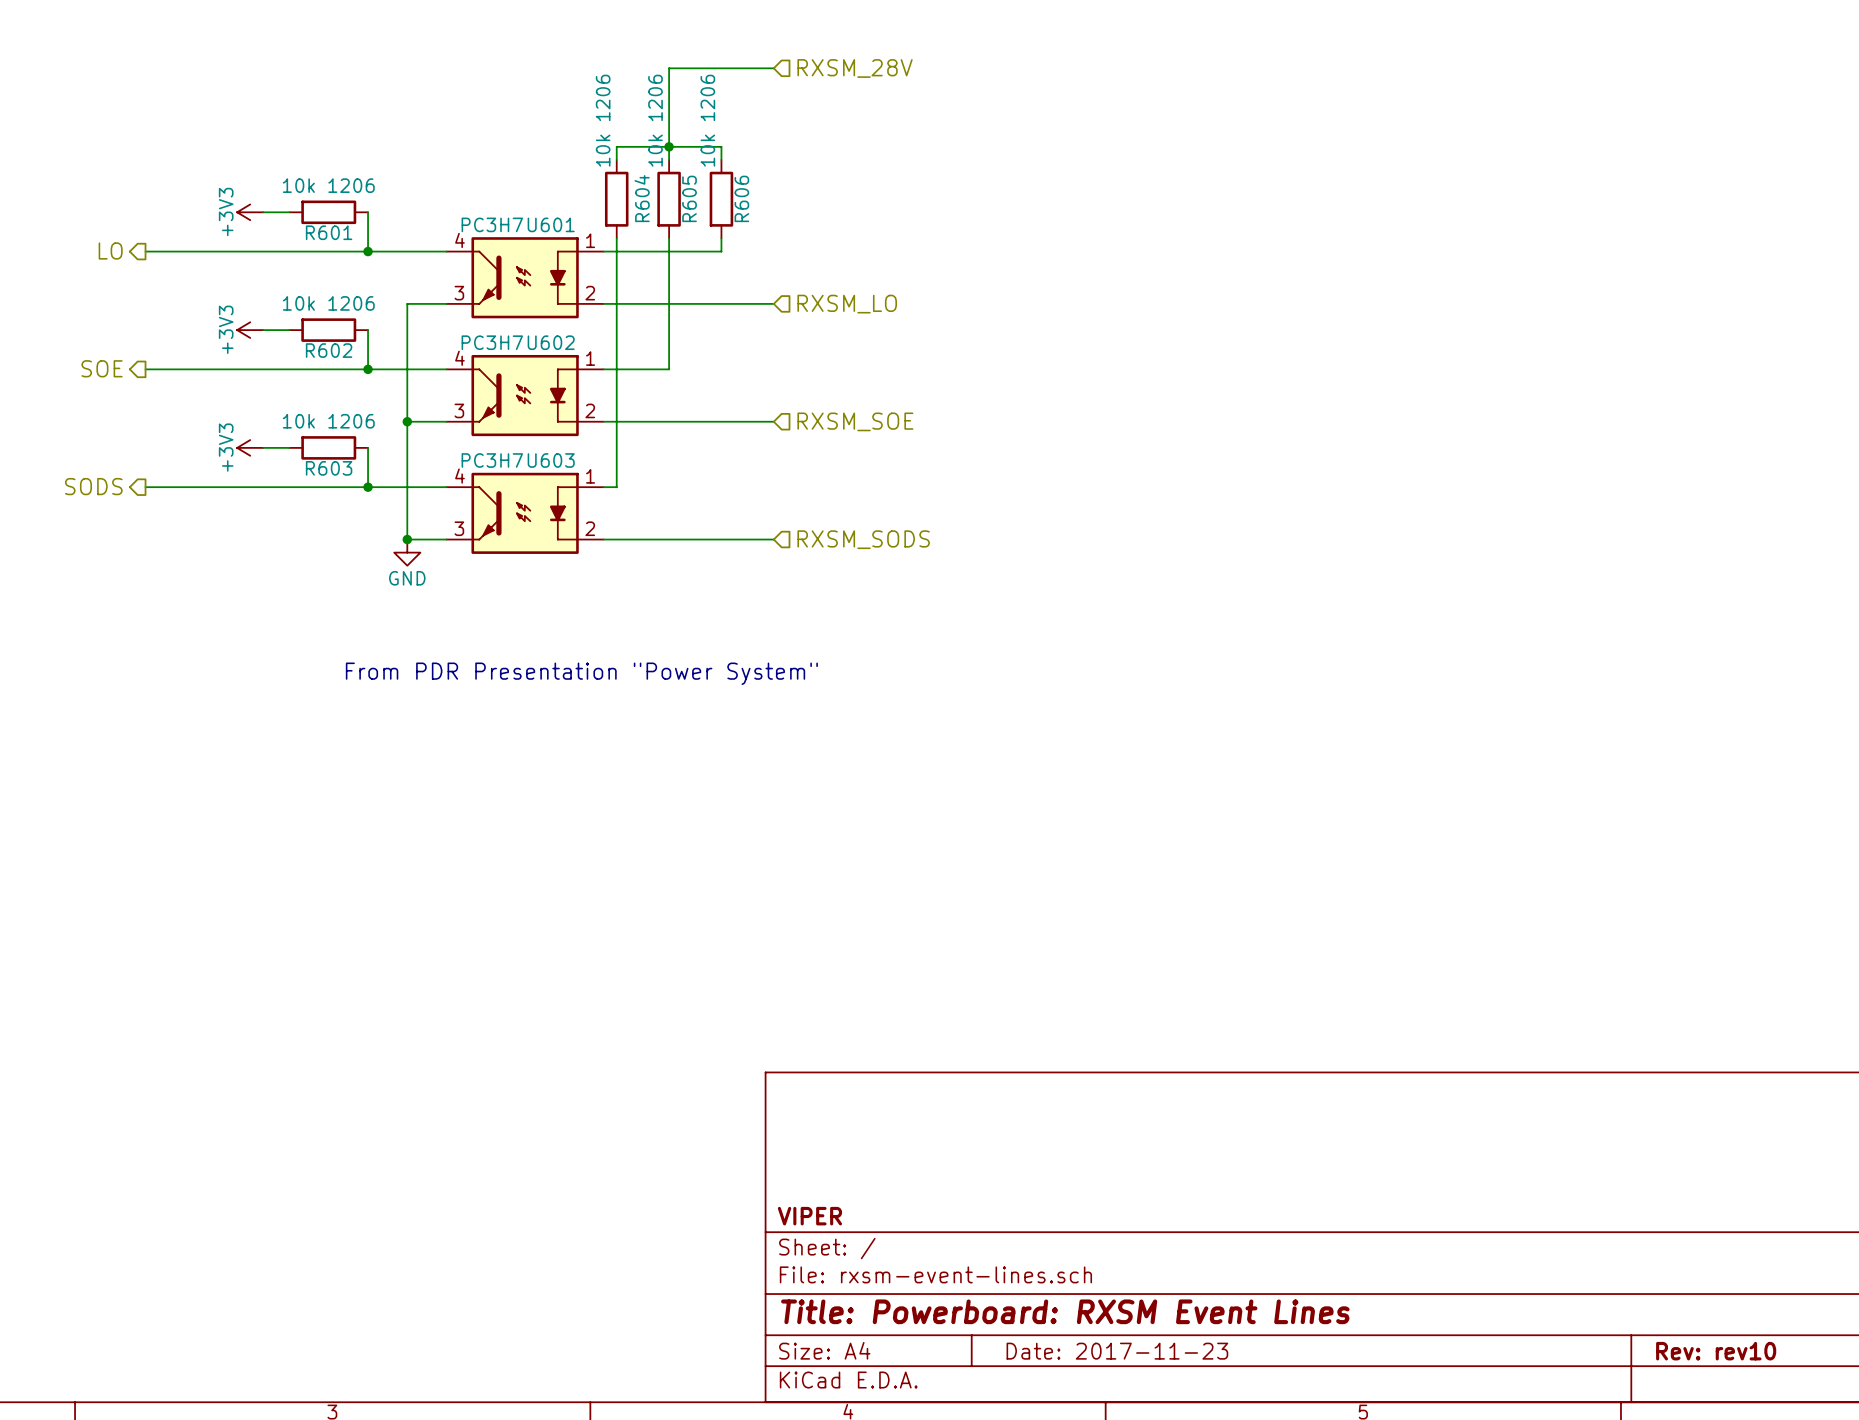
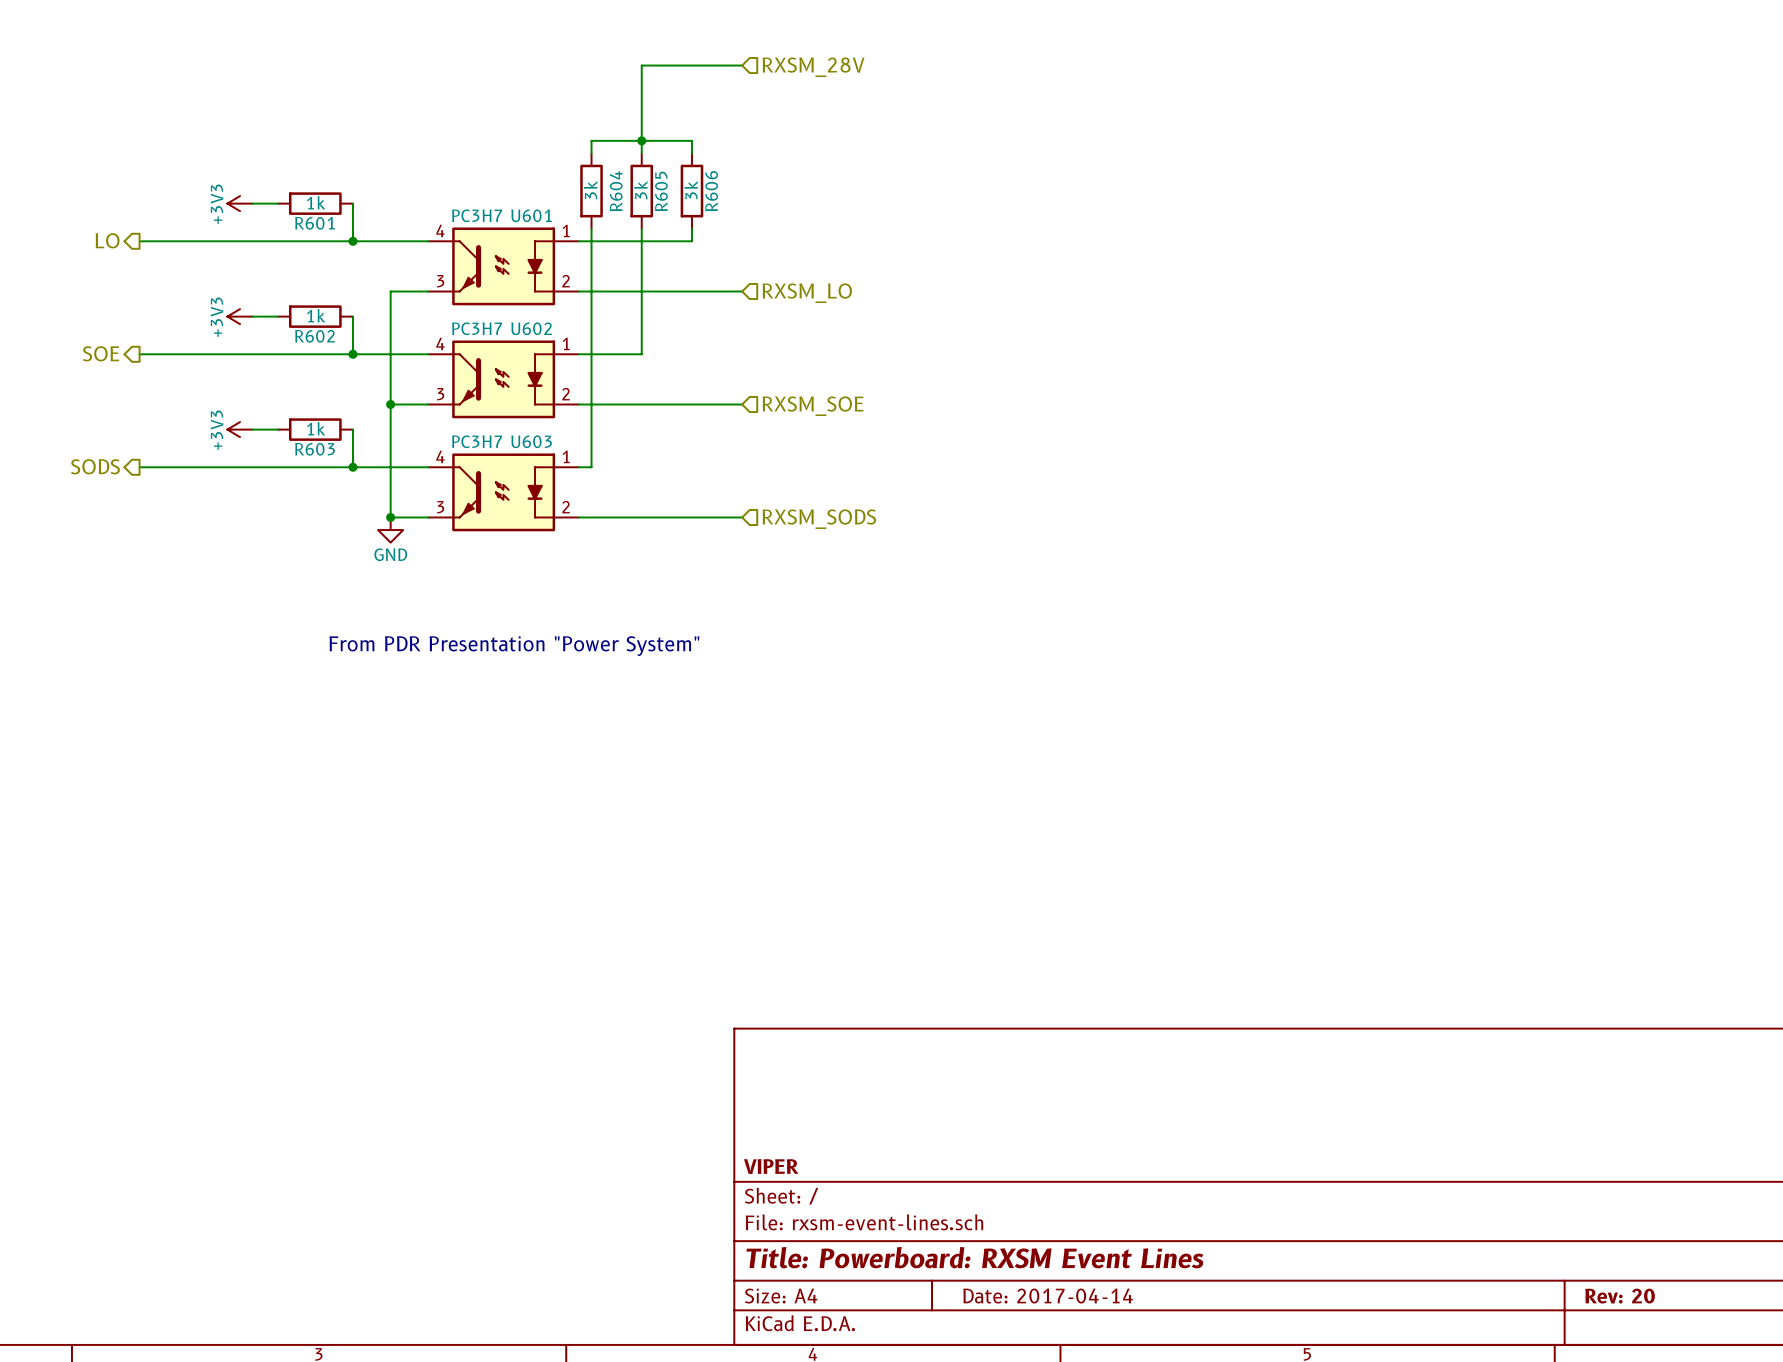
R604 value: 10k 1206 (603, 120) -> 3k (590, 190)
R605 value: 10k 1206 (655, 120) -> 3k (640, 190)
R606 value: 10k 1206 (707, 120) -> 3k (691, 190)
R601 value: 10k 1206 (328, 185) -> 1k (316, 202)
R602 value: 10k 1206 (328, 303) -> 1k (316, 315)
R603 value: 10k 1206 (328, 421) -> 1k (316, 428)
title block: Date: 2017-11-23 (1117, 1351) -> Date: 2017-04-14 (1048, 1296)
title block: Rev: rev10 (1716, 1351) -> Rev: 20 (1620, 1296)

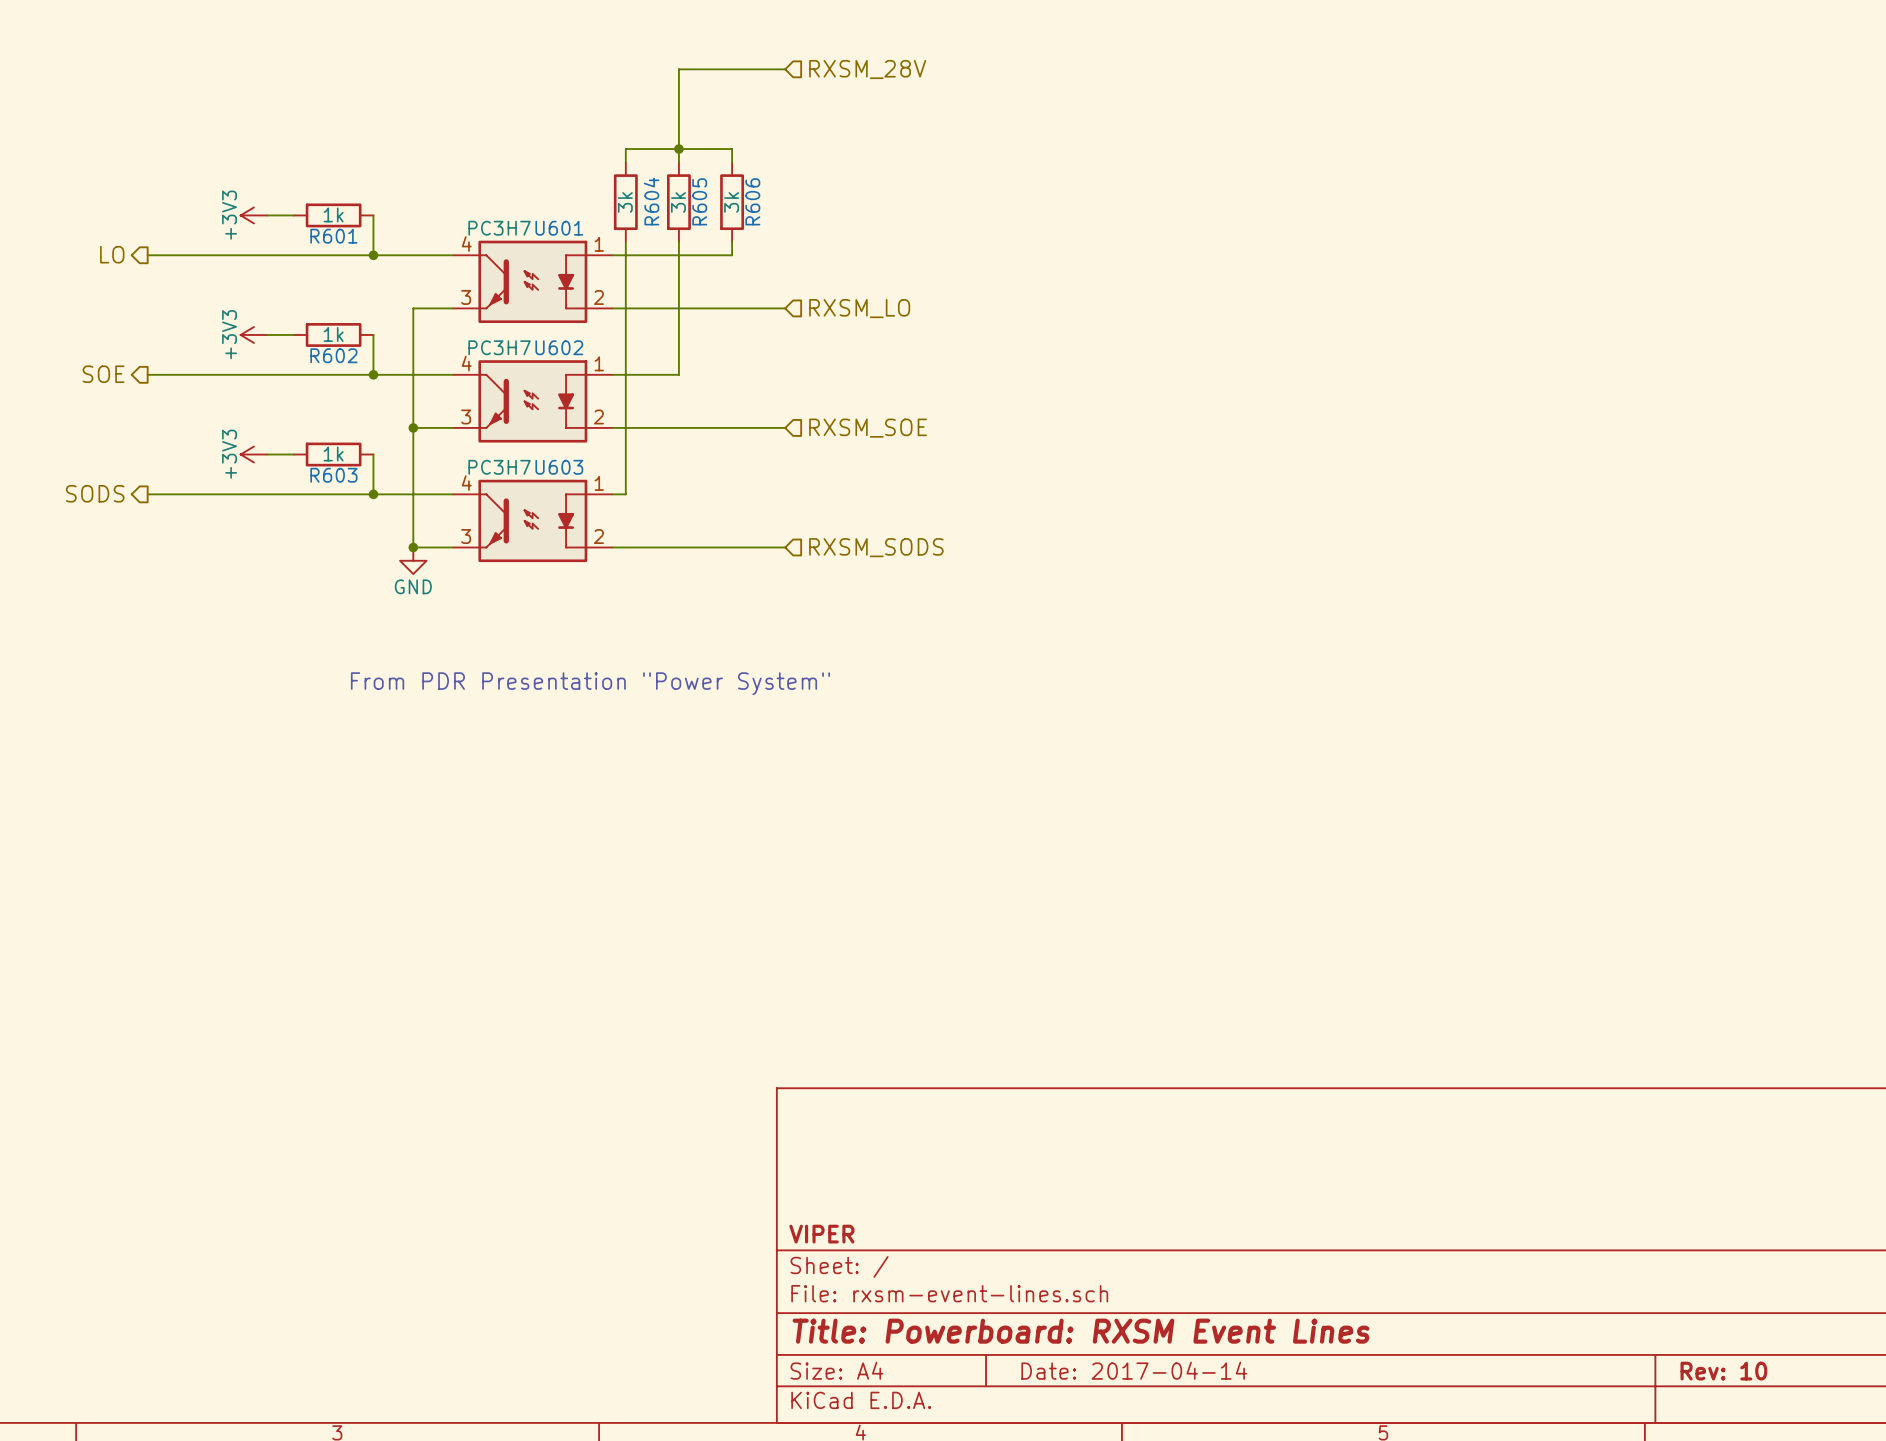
title block: Rev: 20 (1620, 1296) -> Rev: 10 (1723, 1371)

